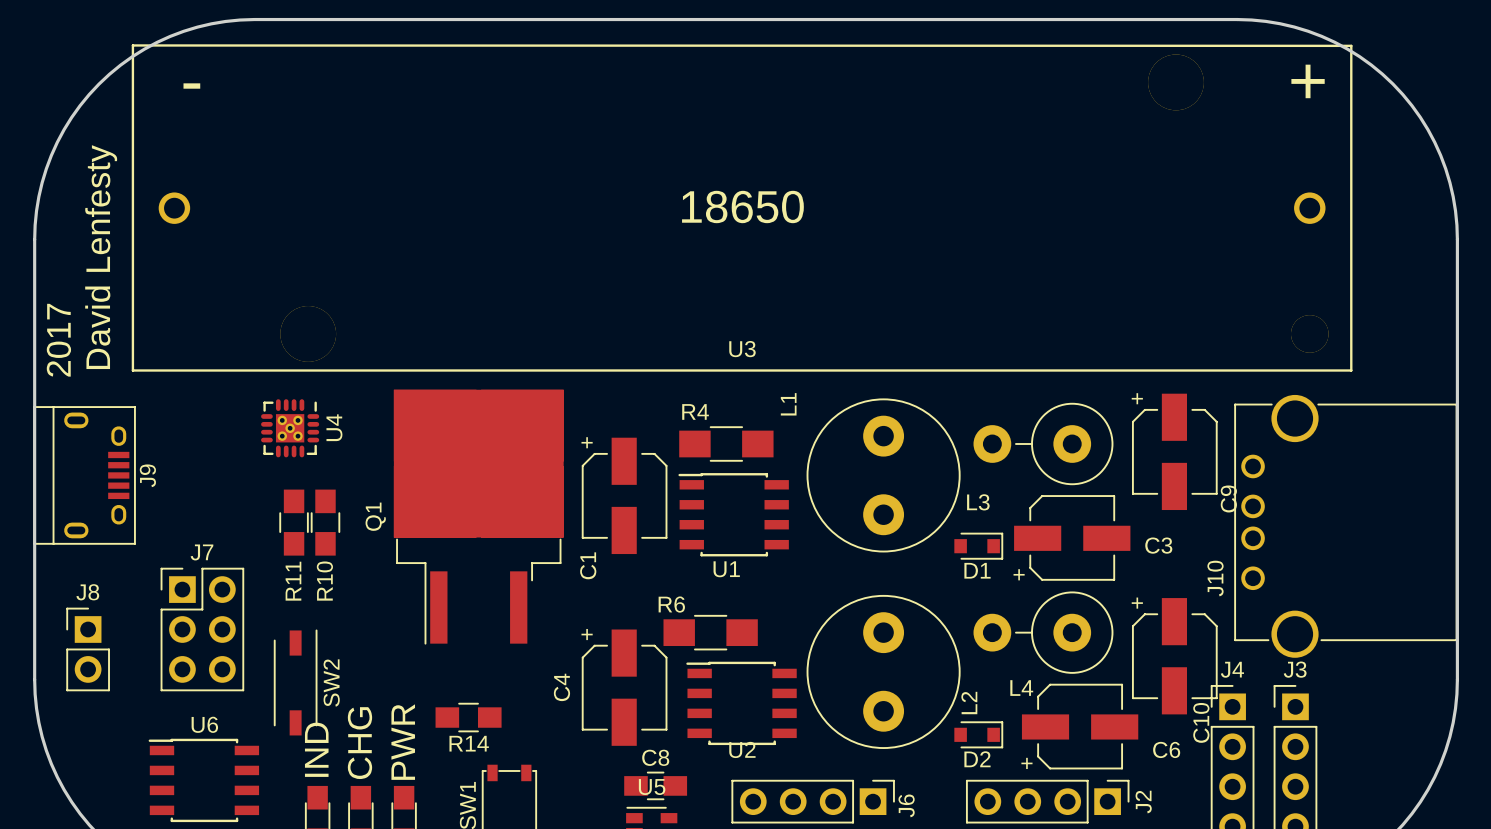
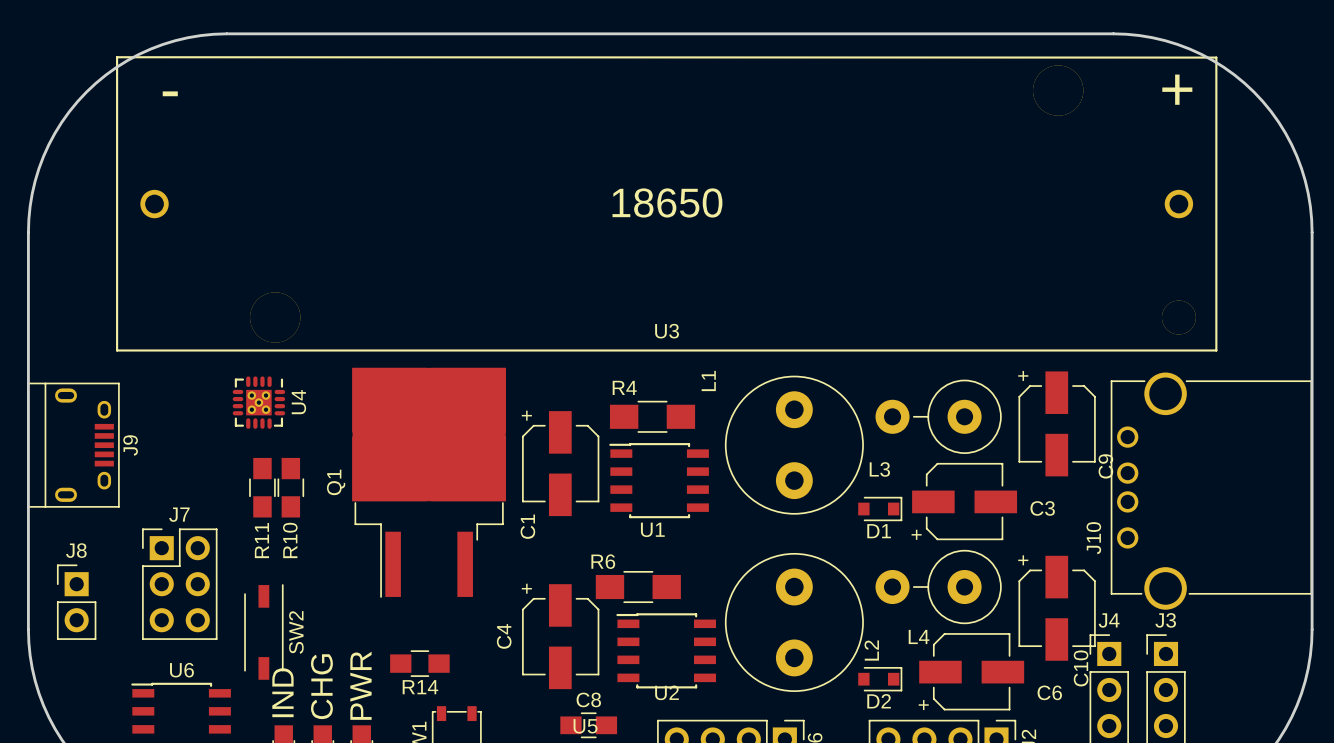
text: David Lenfesty (101, 257) -> none
text: 2017 (58, 340) -> none

